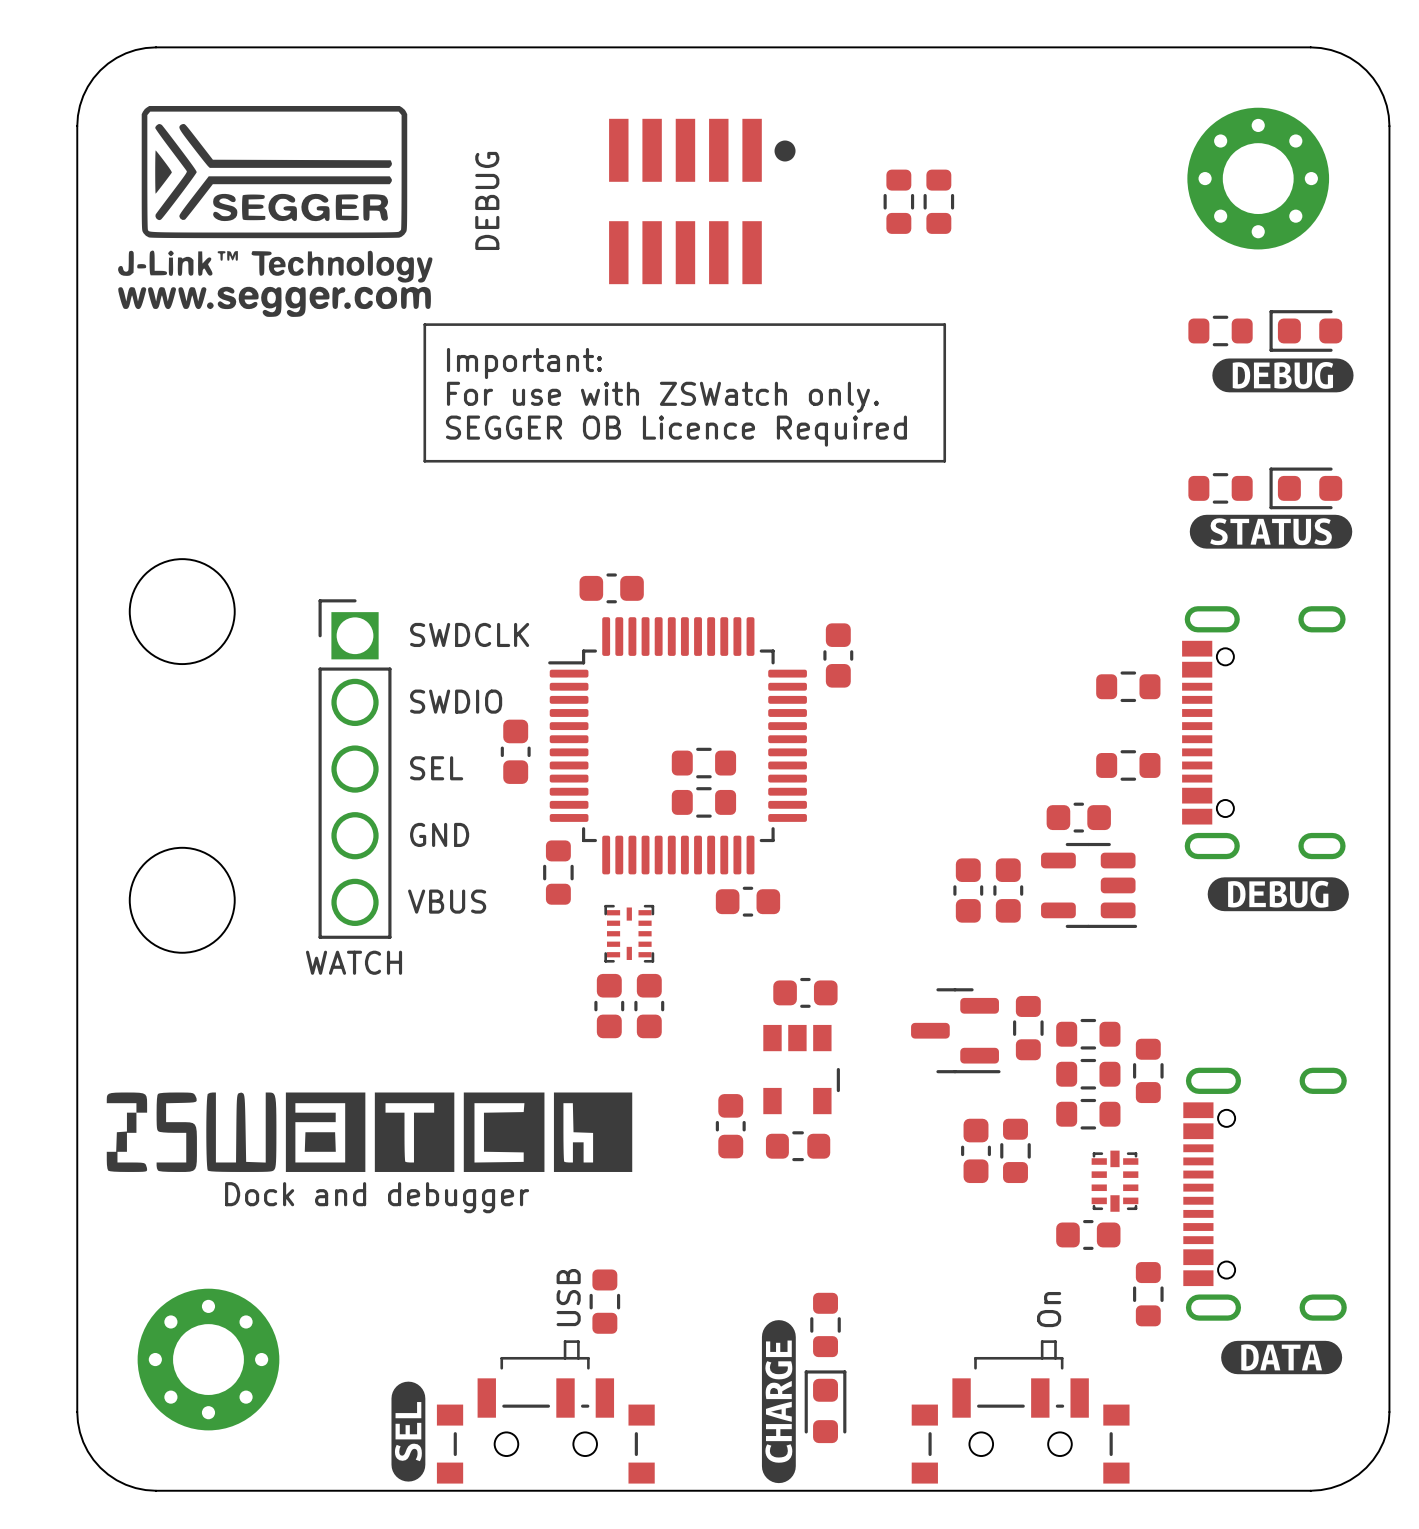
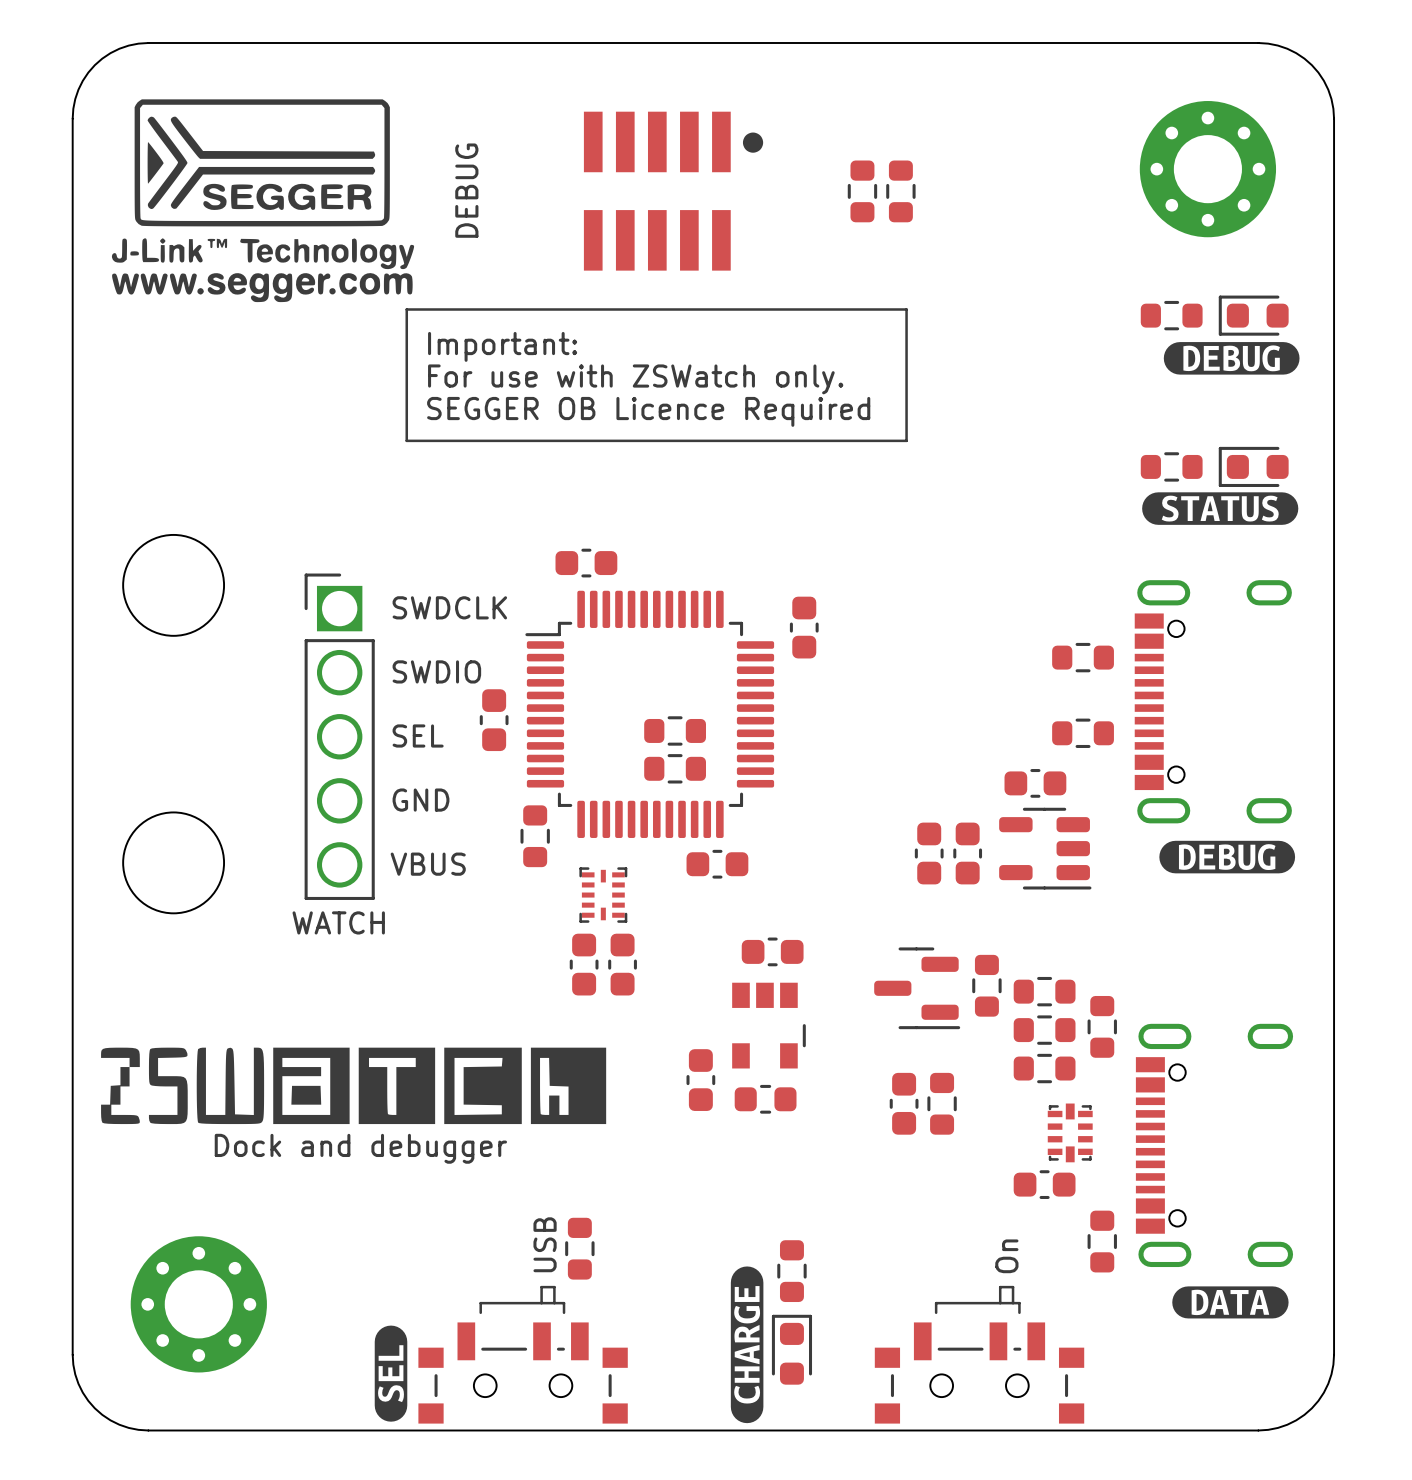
part footprint: [961, 1118, 991, 1184] -> [927, 1072, 957, 1135]
part: none -> (904, 1103)
part: (1015, 1150) -> none

